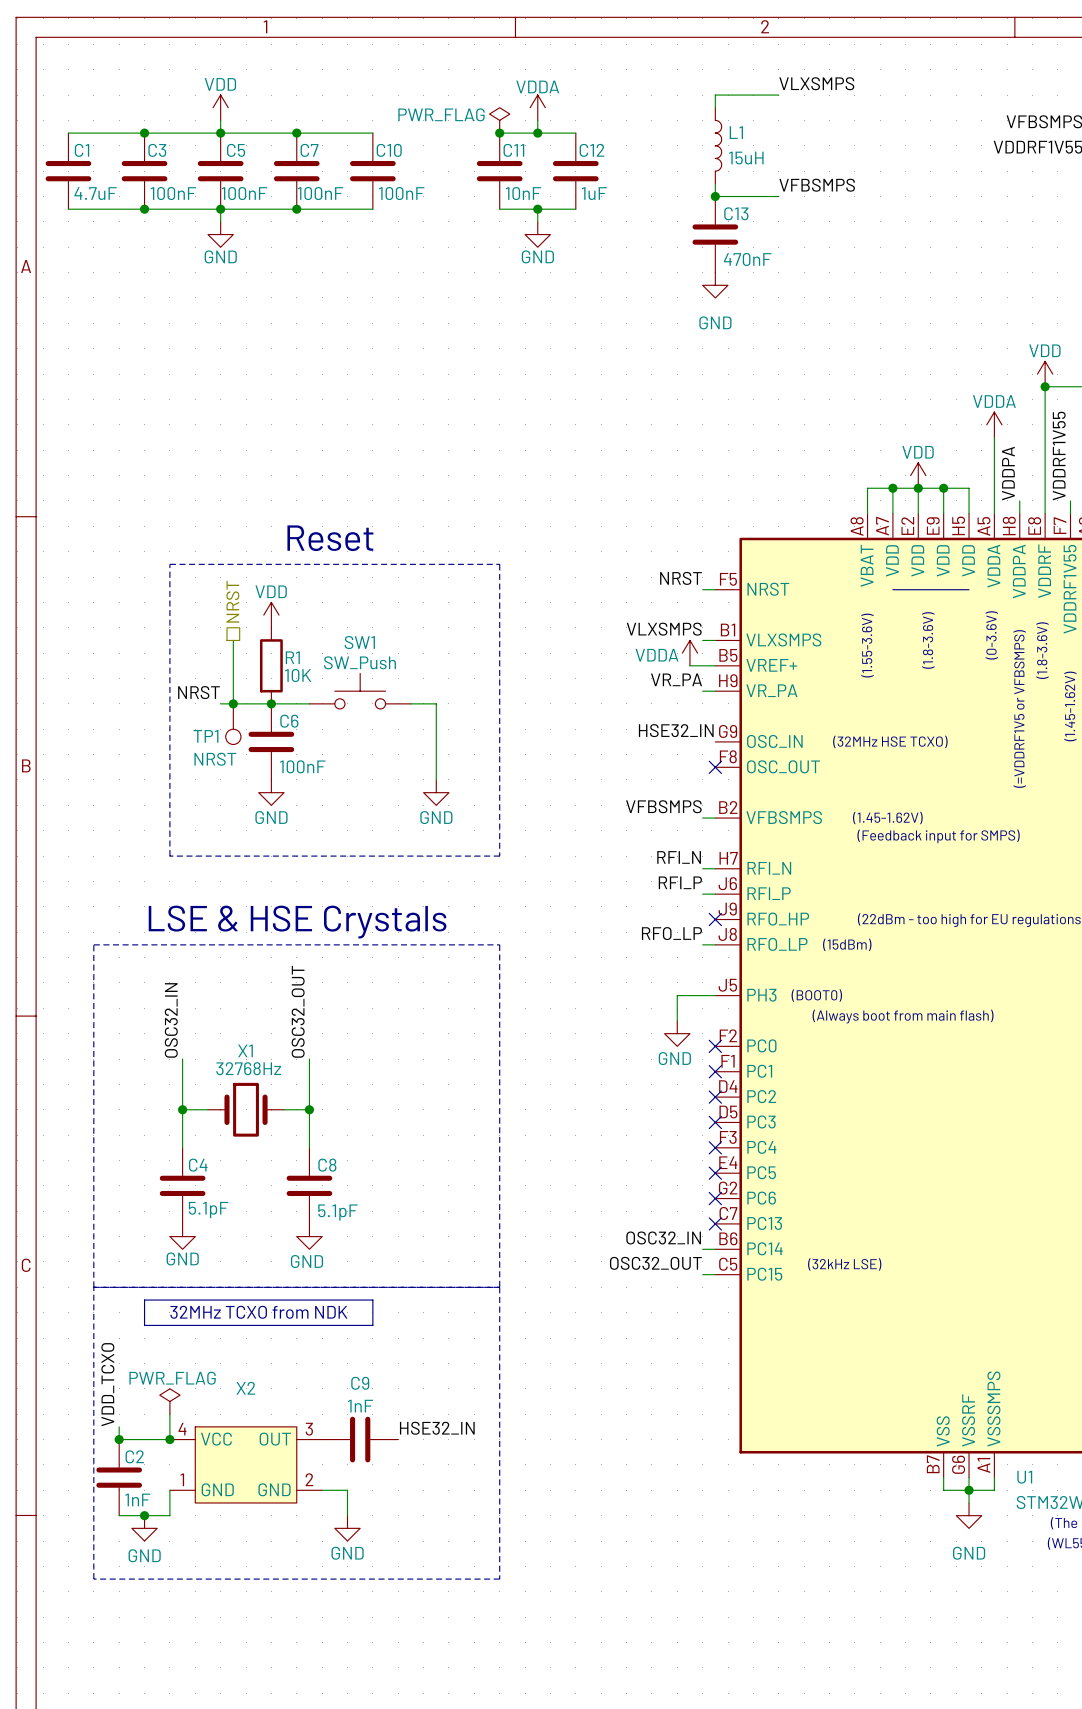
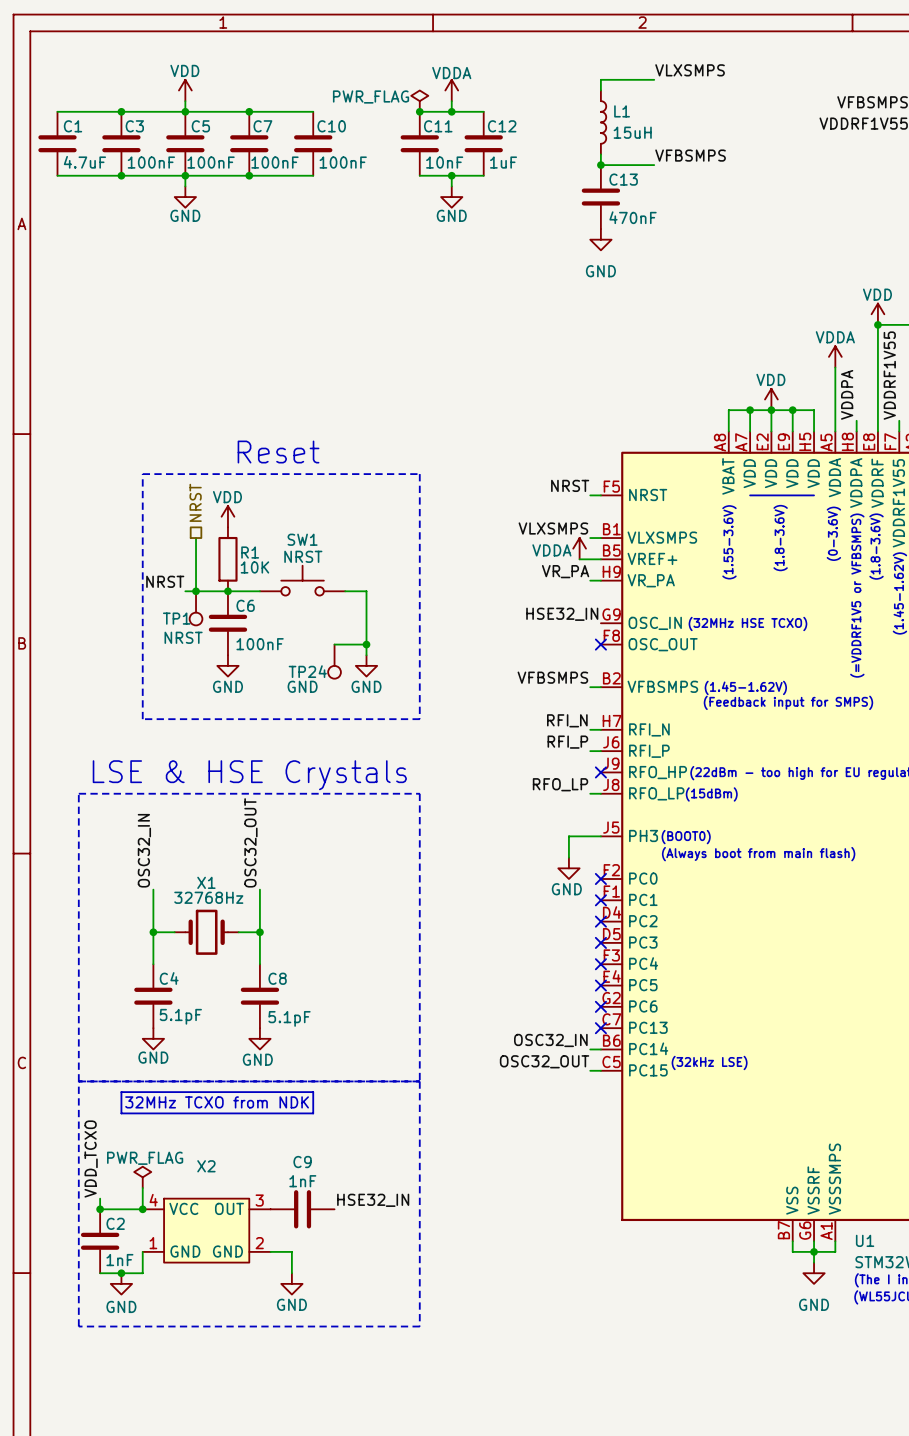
SW1 value: SW_Push (359, 662) -> NRST (303, 556)
wire: none -> (334, 644) (366, 644)
junction: none -> (366, 644)
TP24: none -> GND (334, 661)

